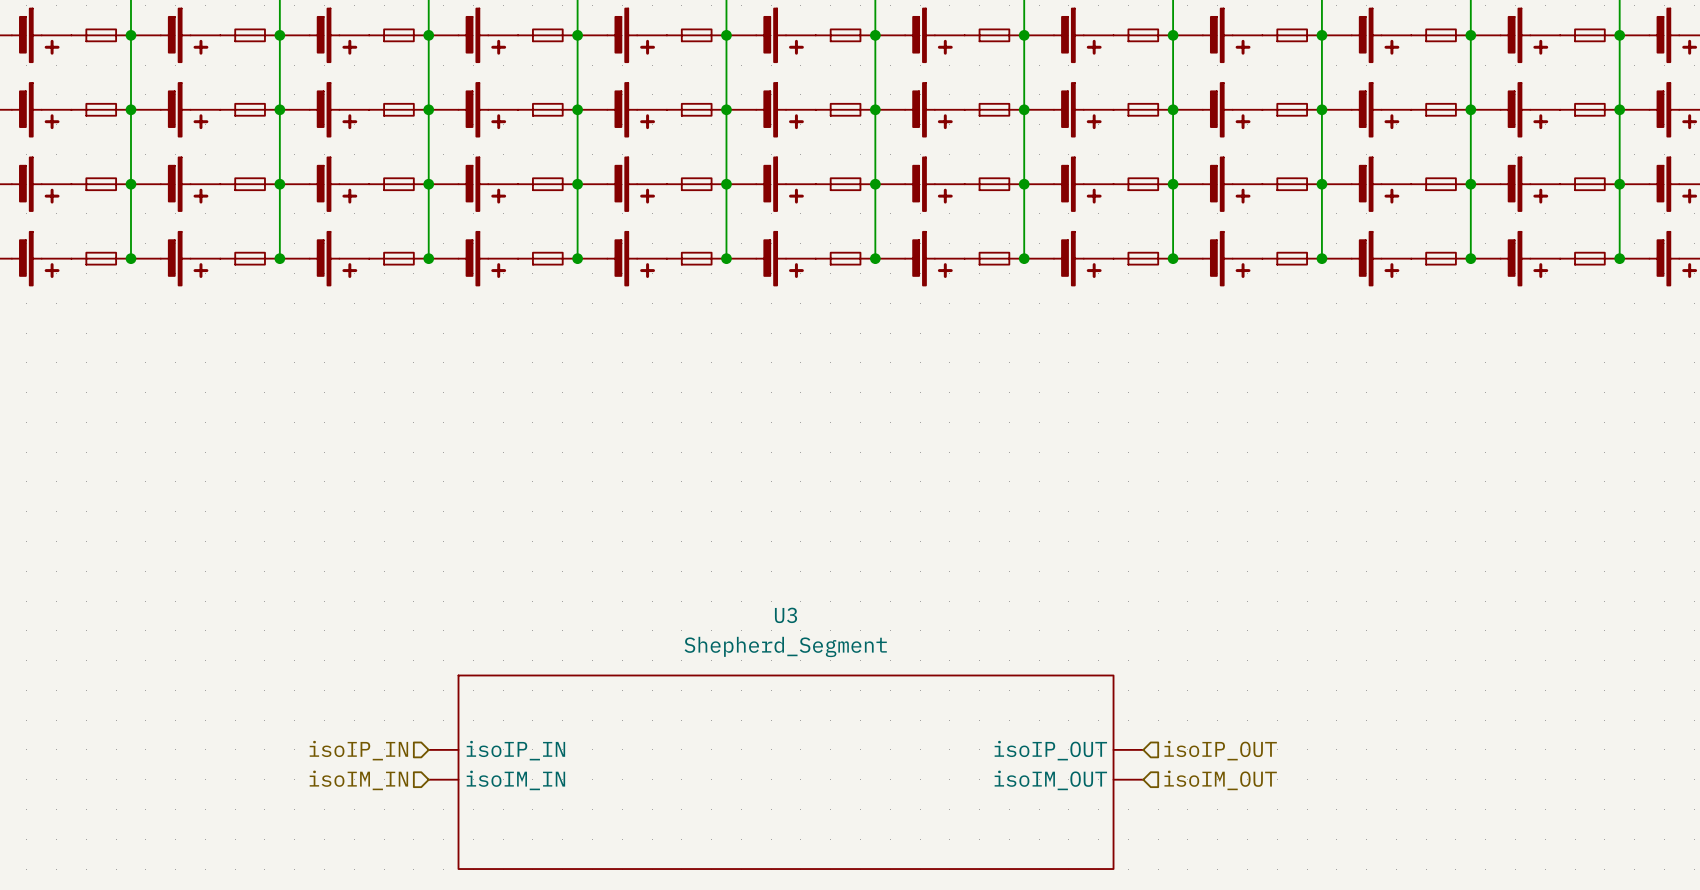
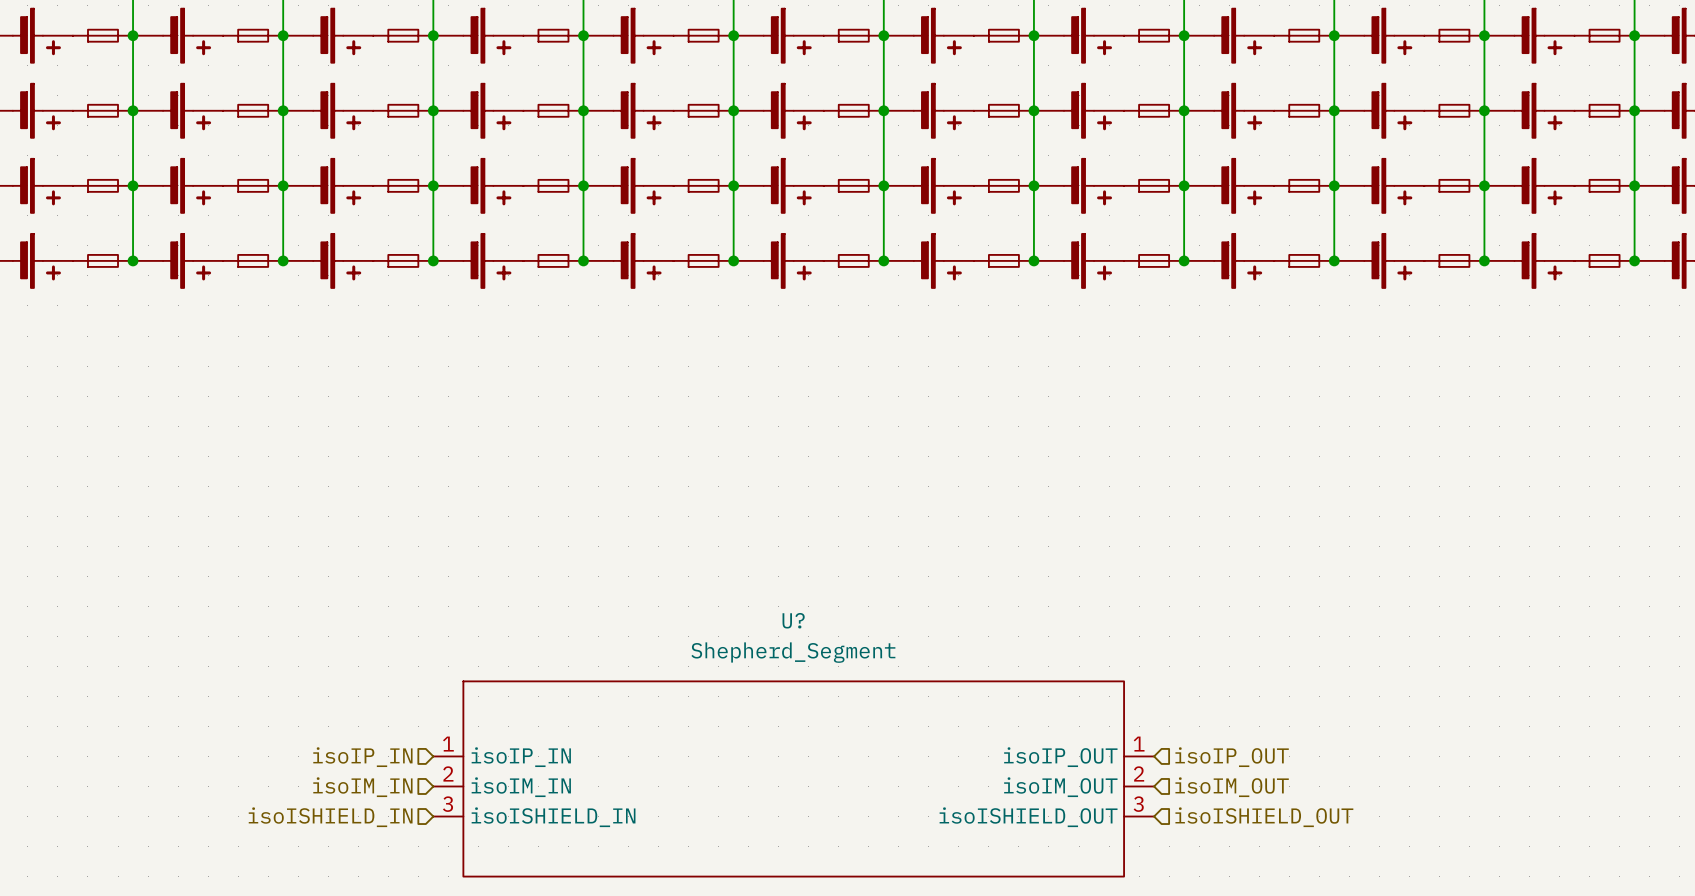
U3: Shepherd_Segment (786, 772) -> none
U?: none -> Shepherd_Segment (793, 778)
hierarchical label: none -> isoISHIELD_IN (330, 817)
hierarchical label: none -> isoISHIELD_OUT (1264, 817)

